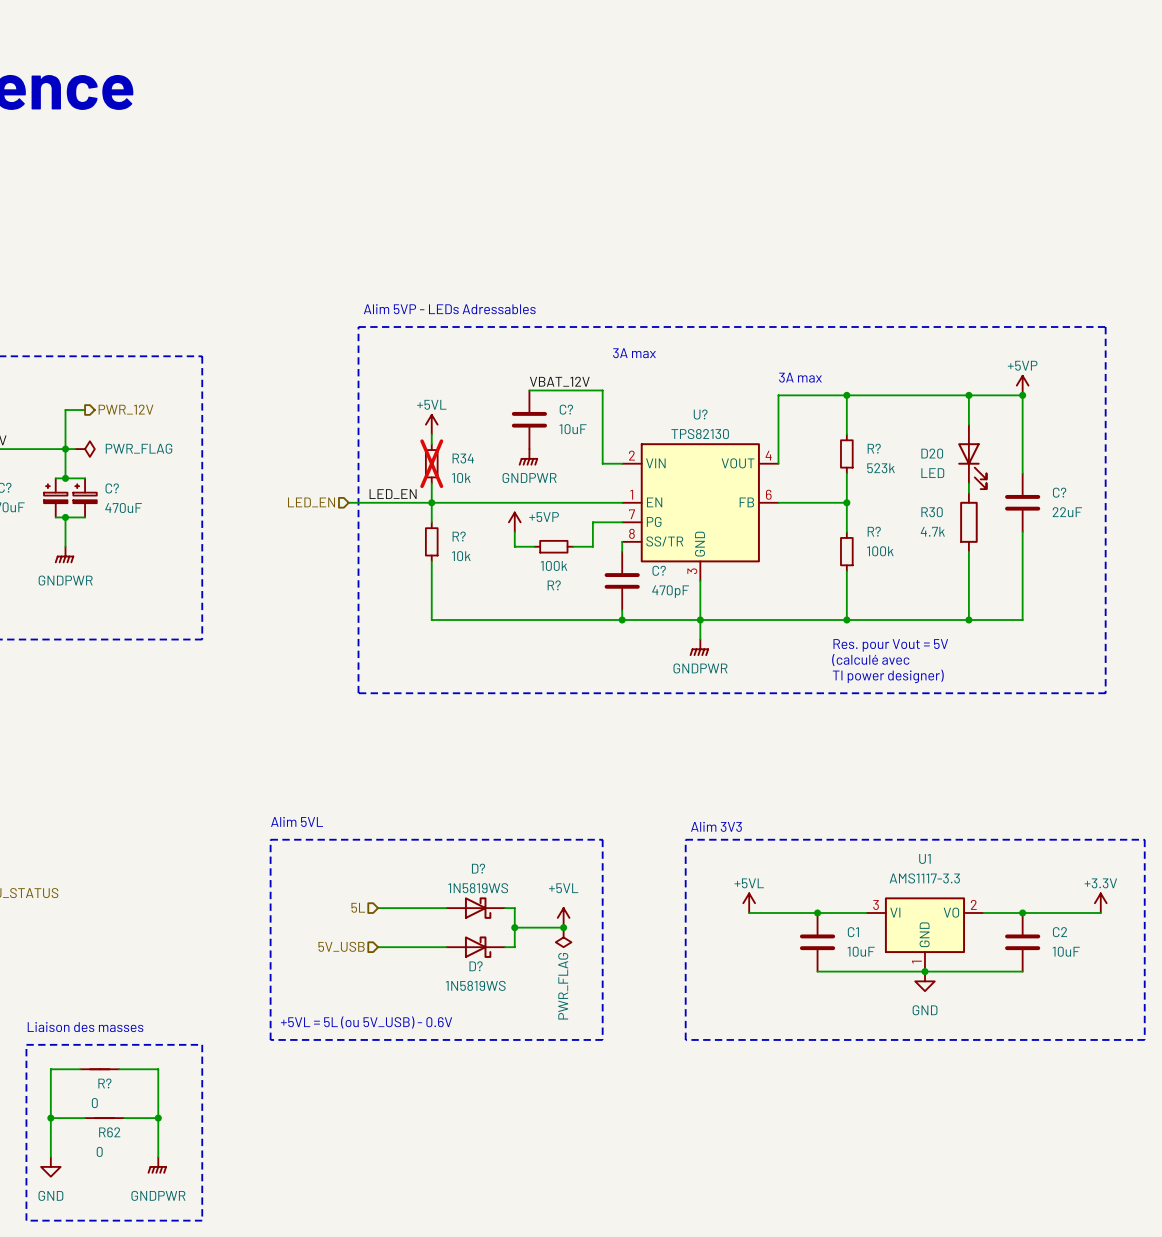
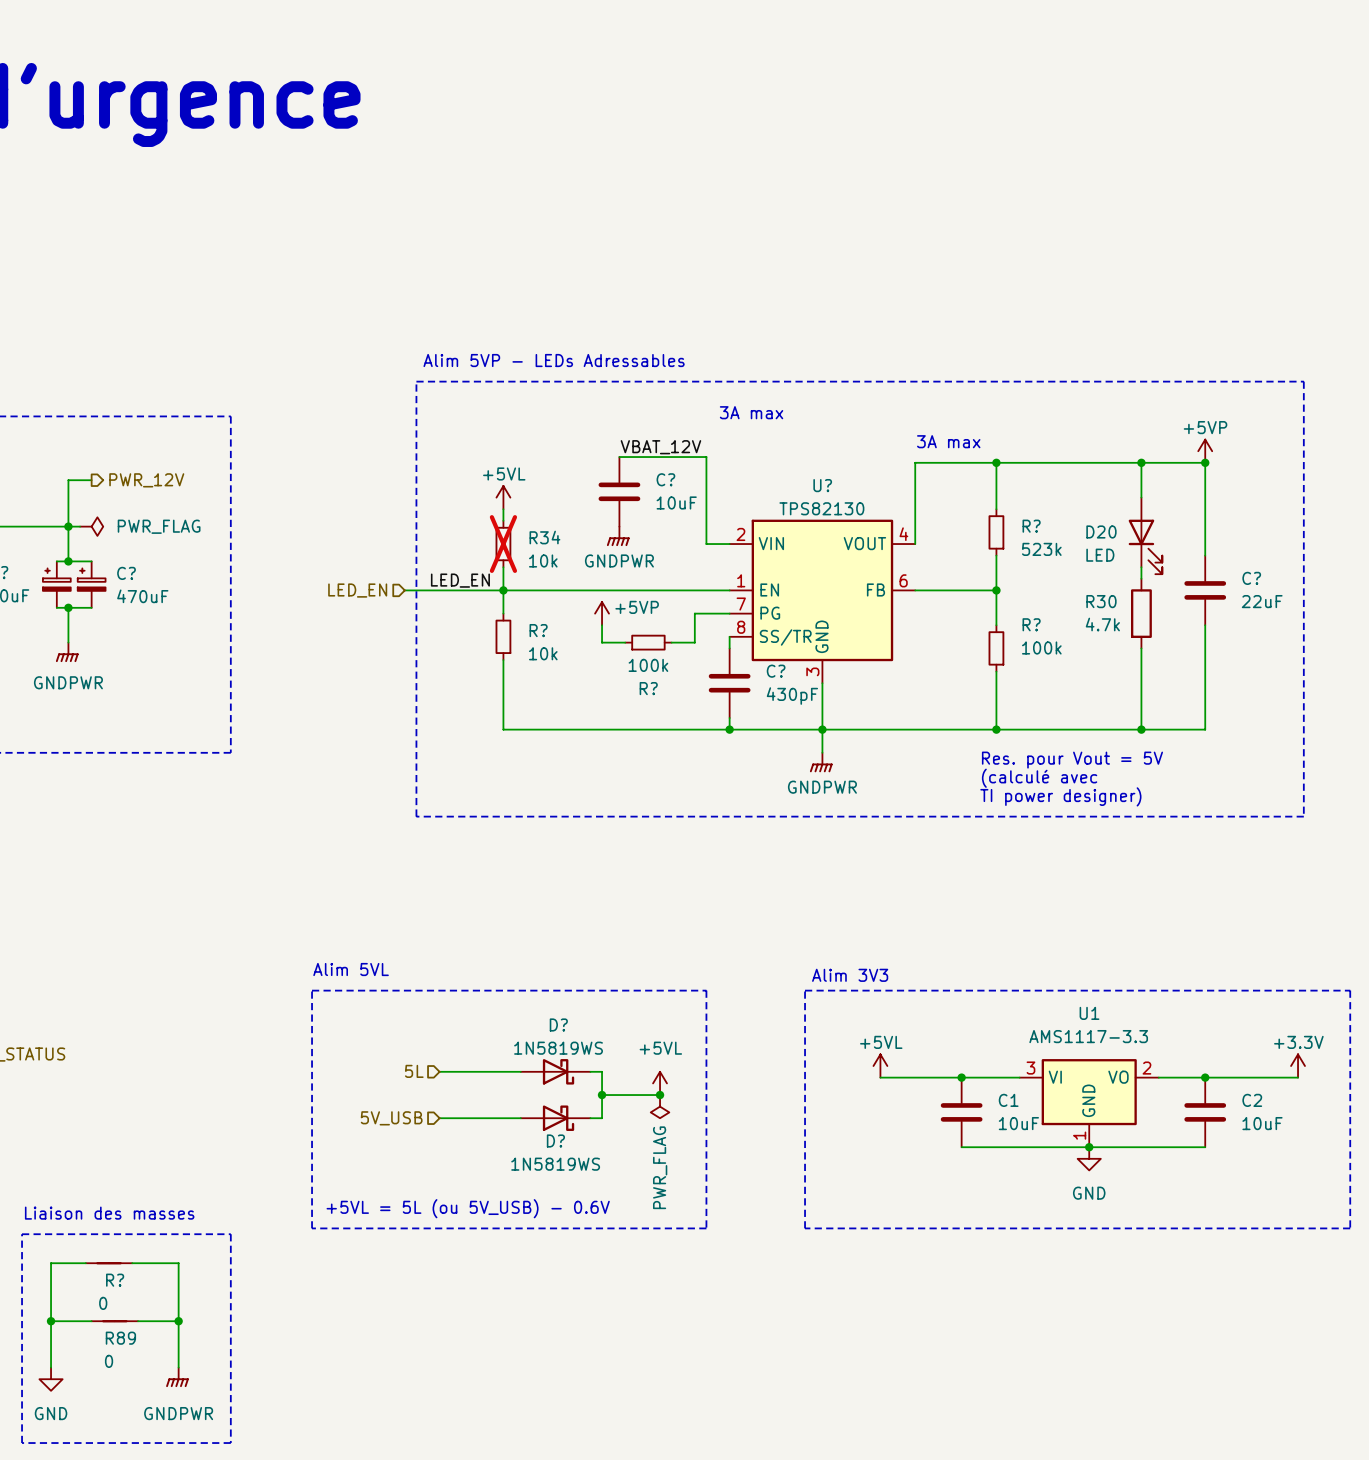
C? value: 470pF (670, 591) -> 430pF (792, 696)
R62 name: R62 (109, 1132) -> R89 (120, 1338)

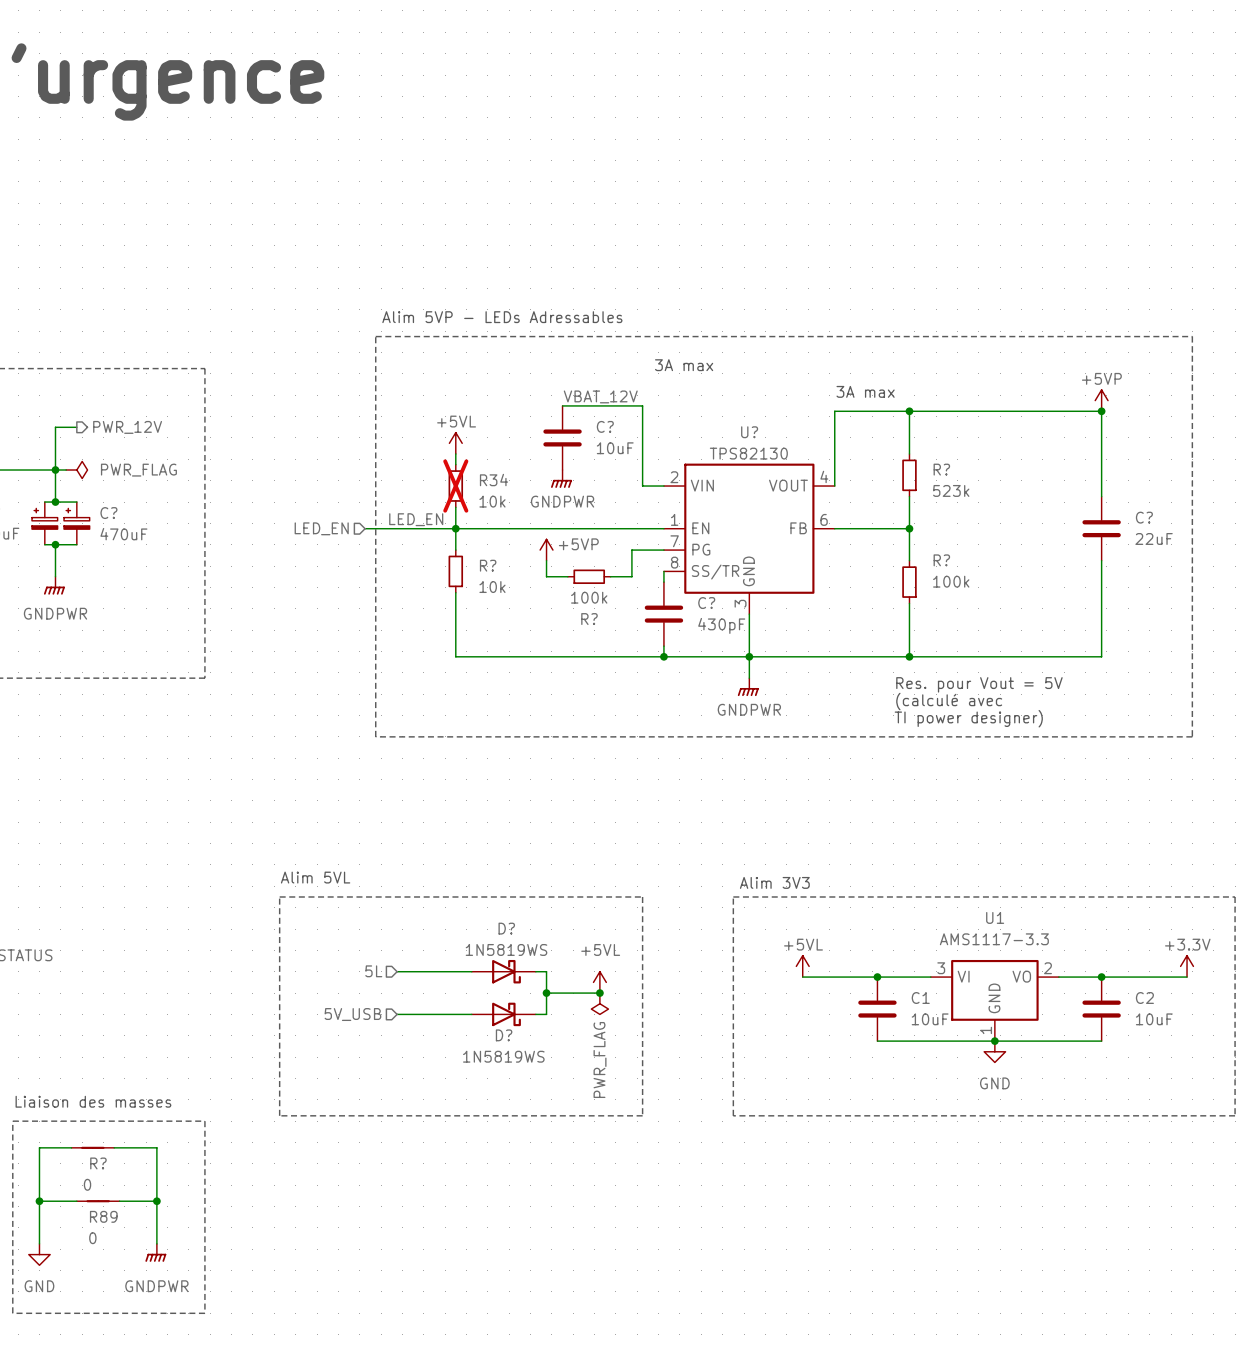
wire: (1141, 462) (1141, 497) -> none
junction: (1141, 462) -> none
D20: LED (1145, 535) -> none
wire: (1141, 567) (1141, 578) -> none
R30: 4.7k (1141, 613) -> none
wire: (1141, 648) (1141, 729) -> none
junction: (1141, 729) -> none
text: +5VL = 5L (ou 5V_USB) - 0.6V (468, 1208) -> none

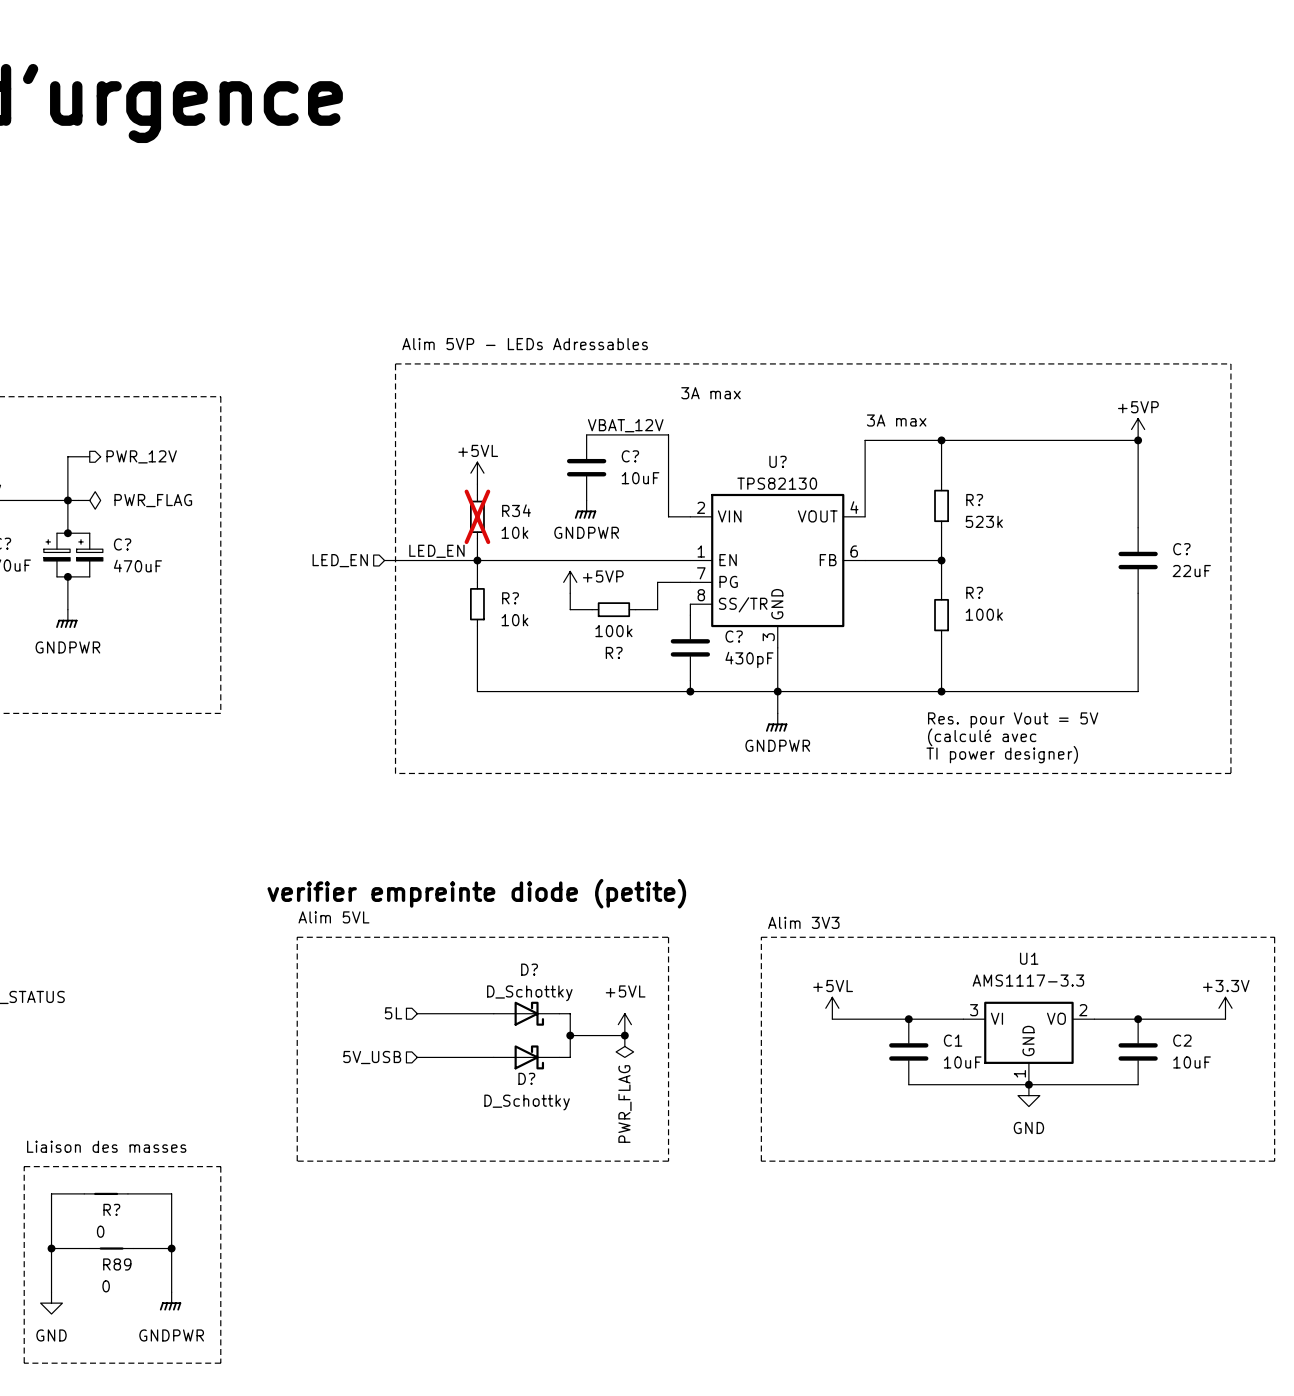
text: none -> verifier empreinte diode (petite) (476, 893)
D? value: 1N5819WS (506, 949) -> D_Schottky (529, 993)
D? value: 1N5819WS (503, 1056) -> D_Schottky (527, 1102)

